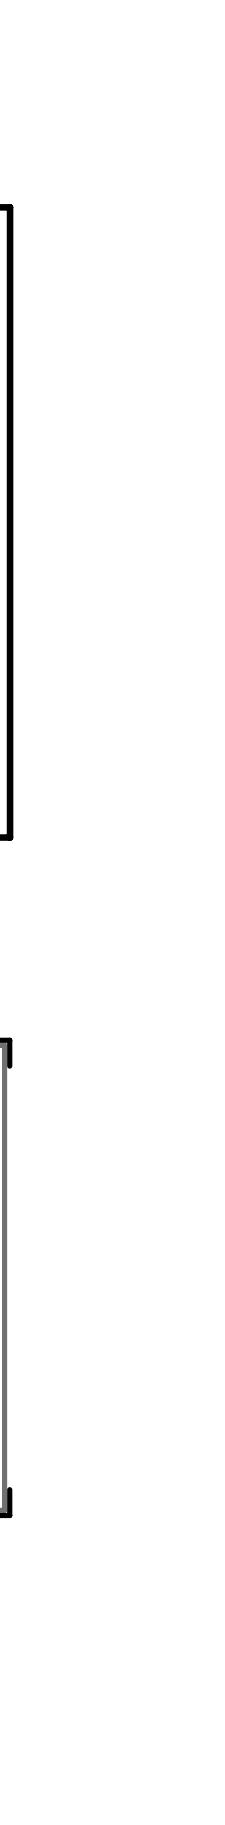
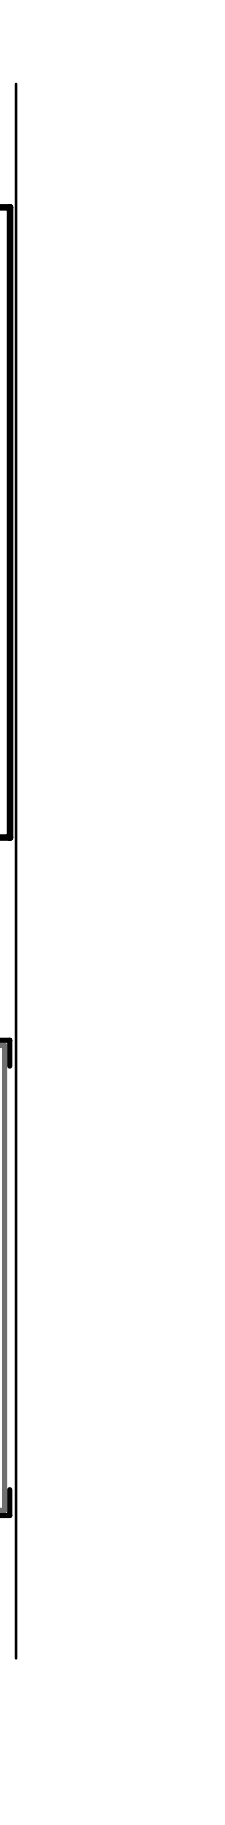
board edge: none -> (16, 83) (16, 1658)

